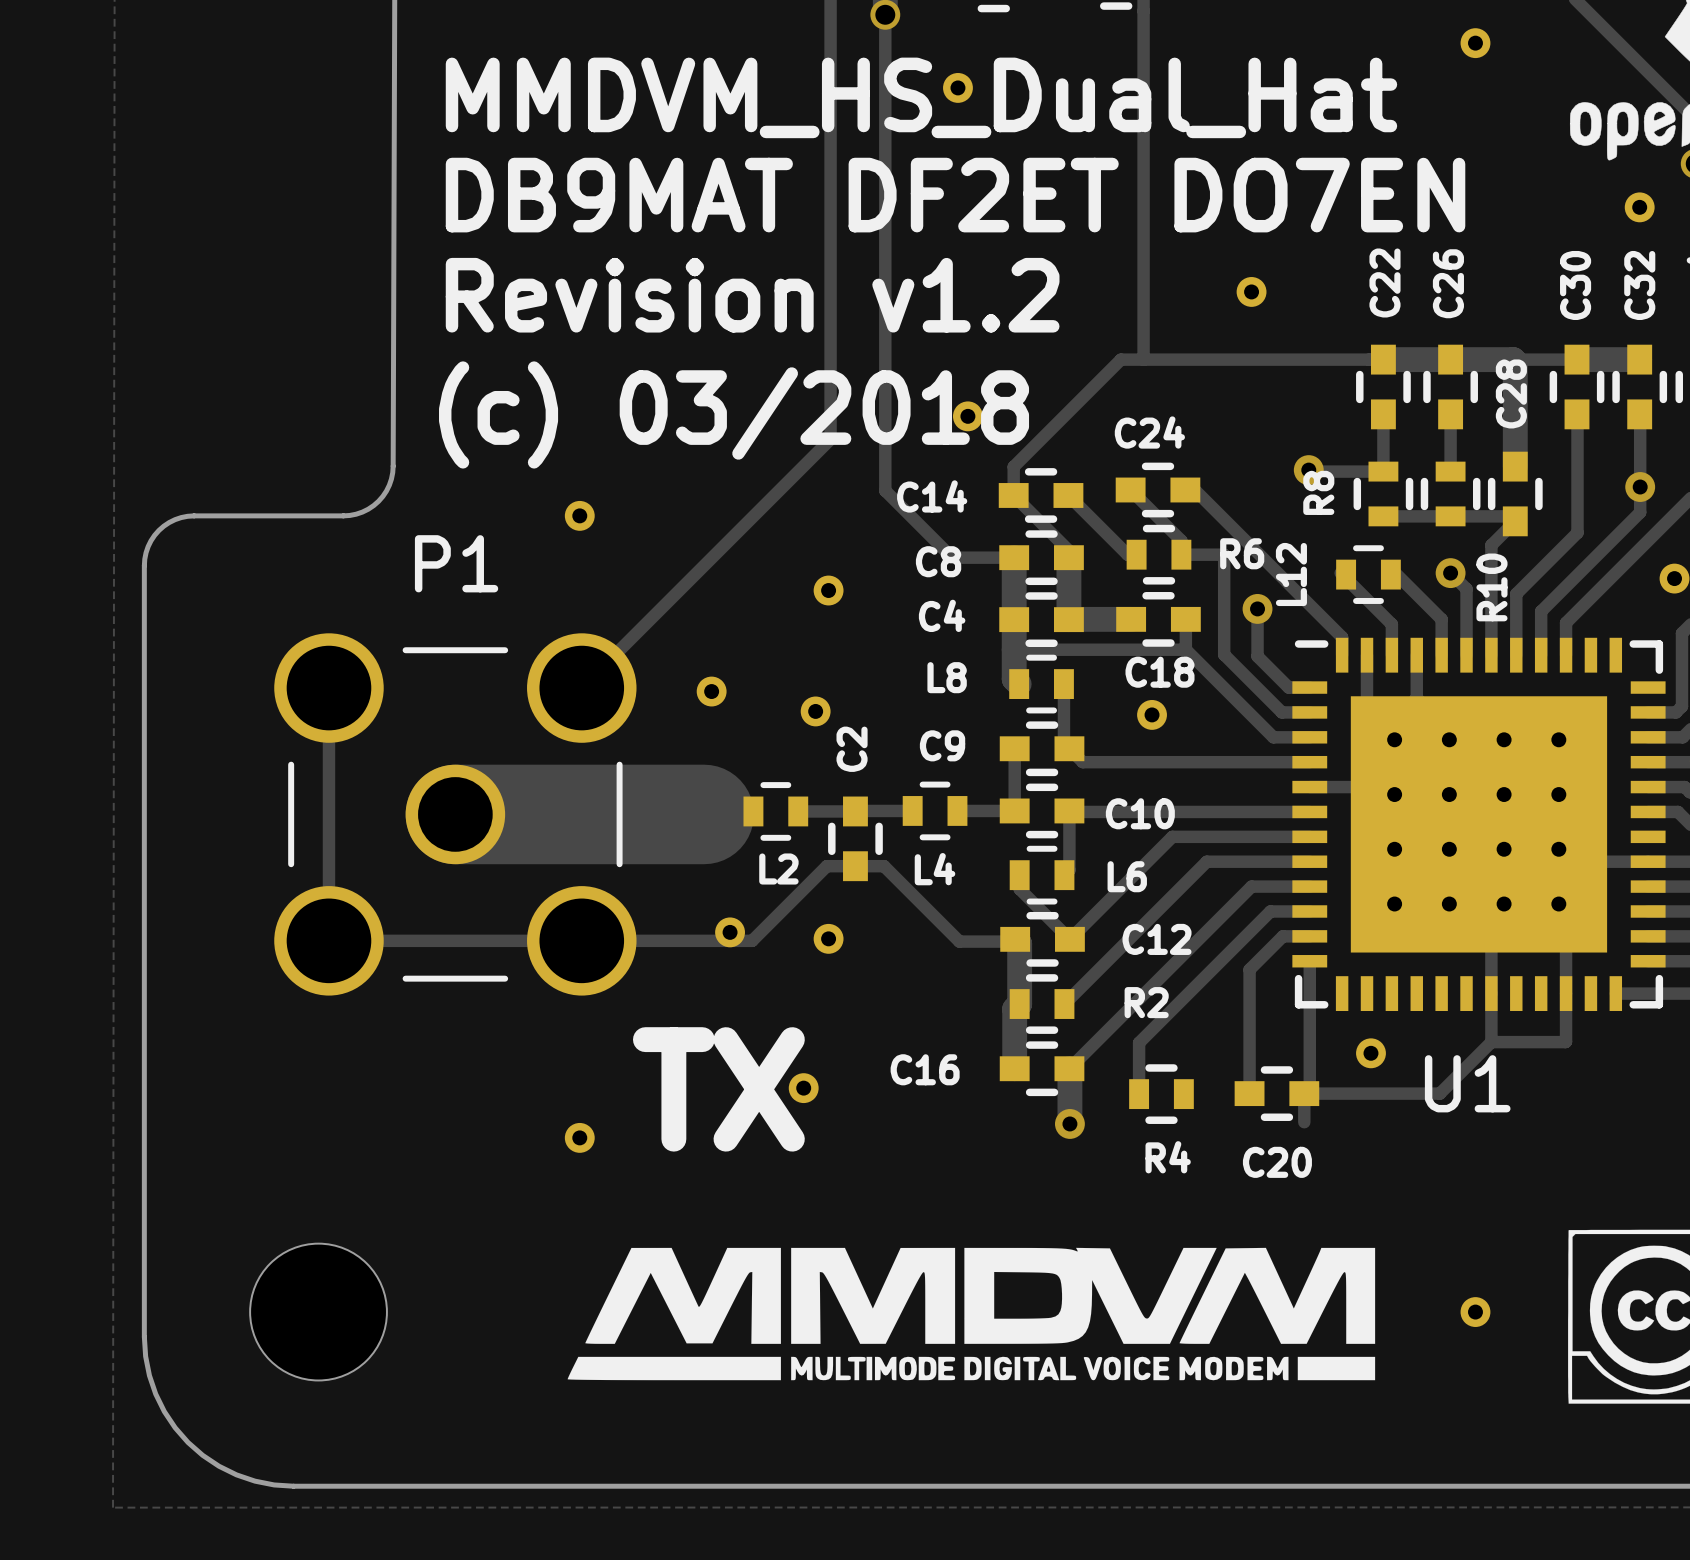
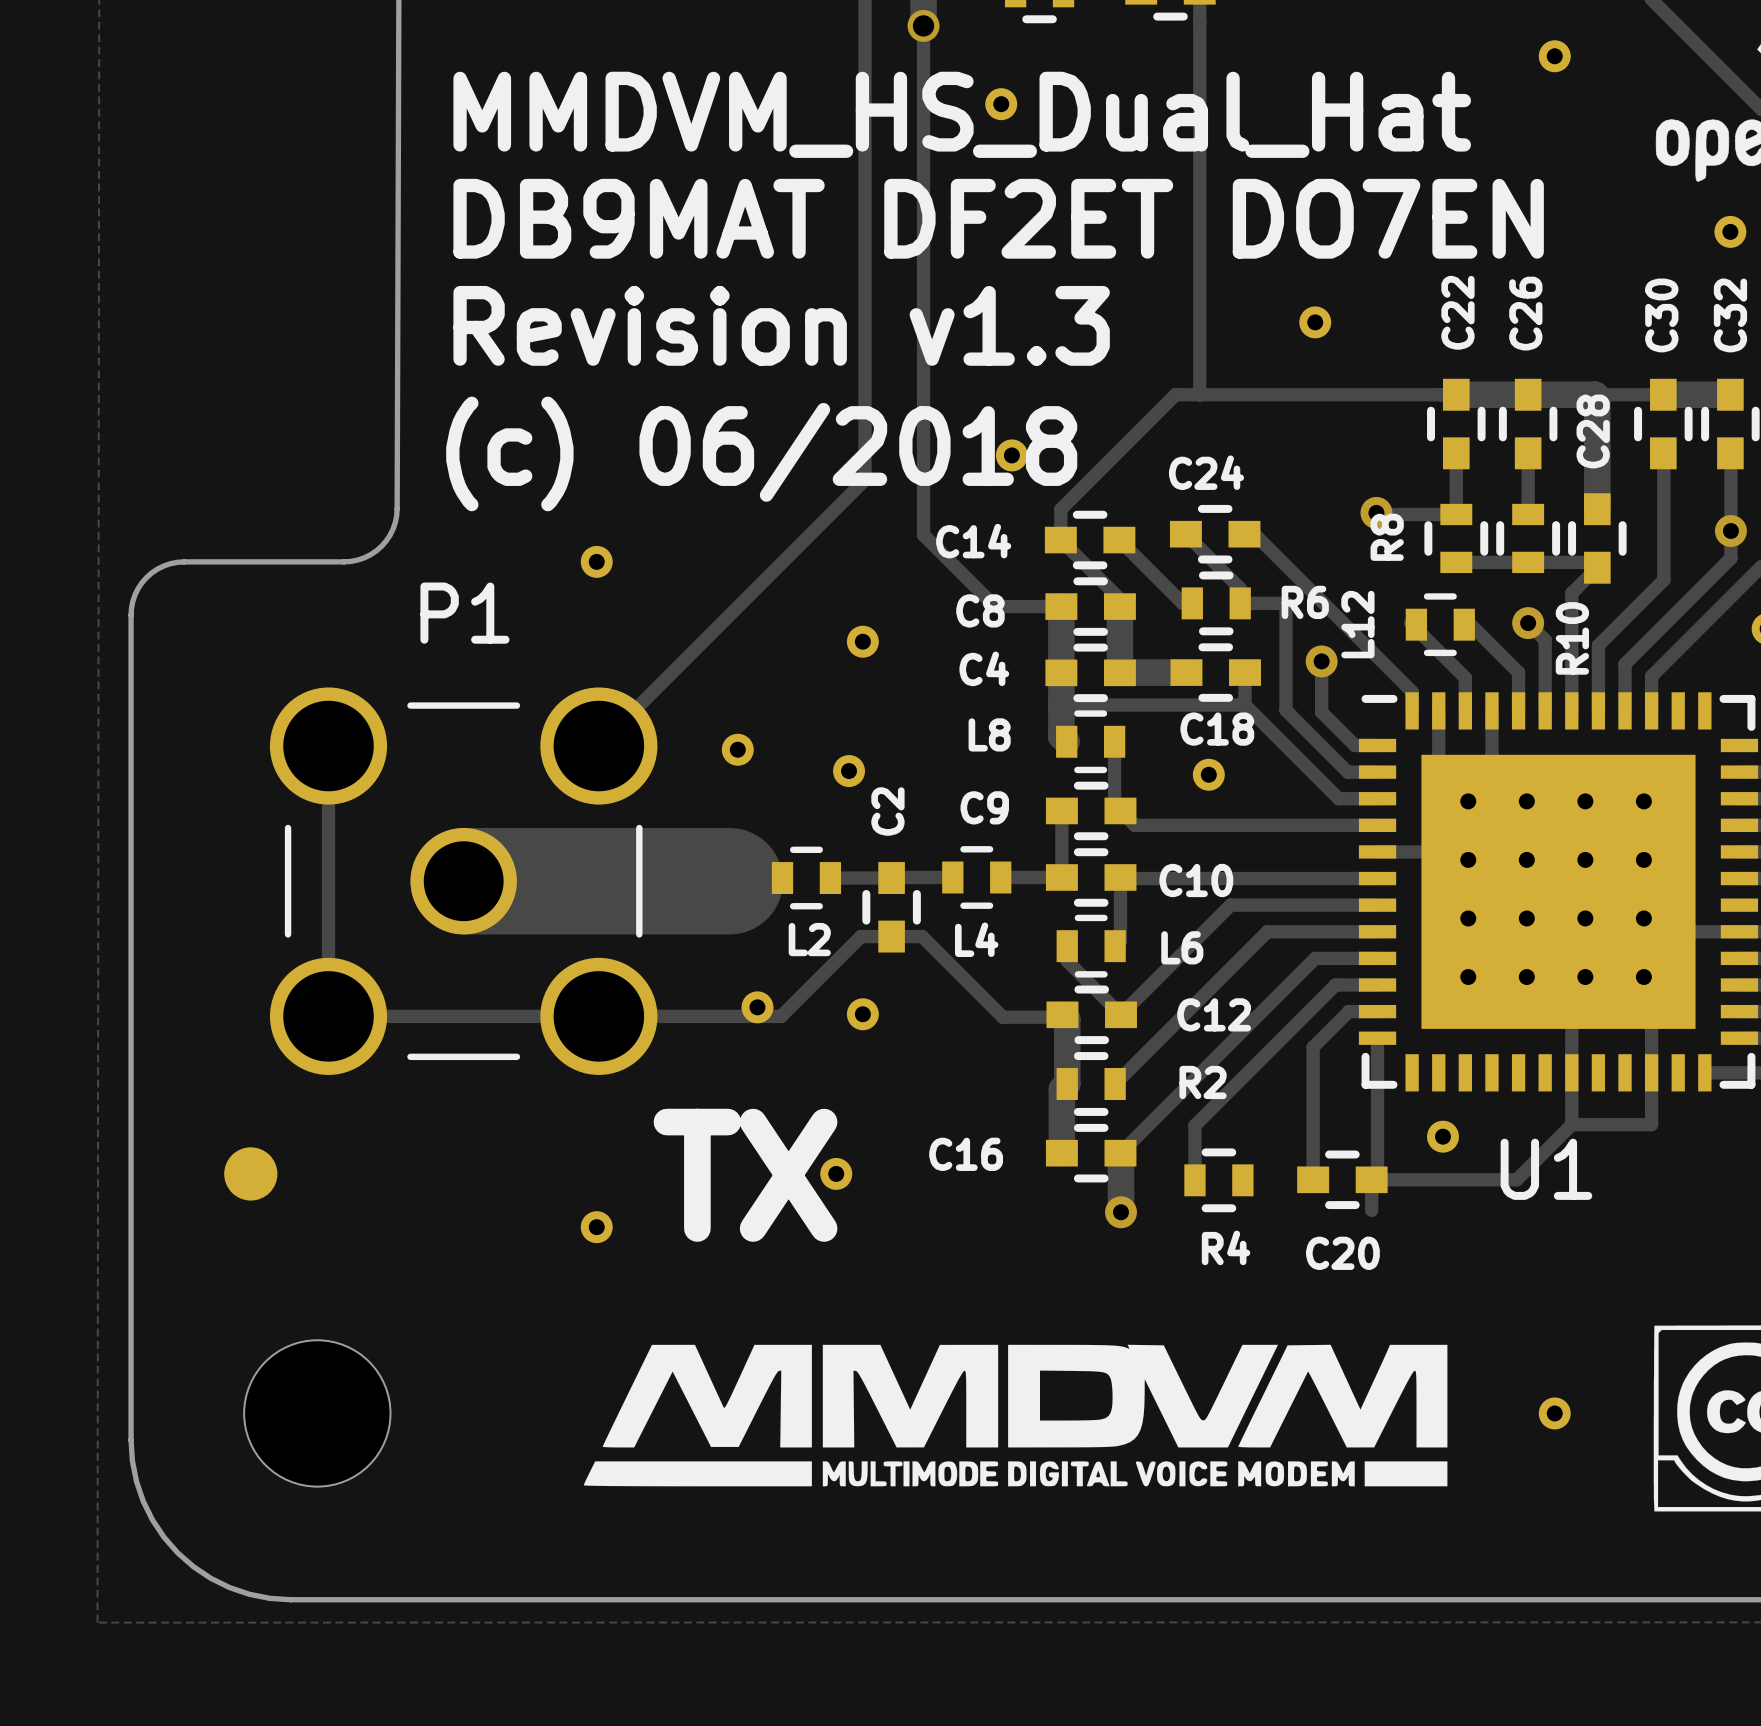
text: Revision v1.2 (752, 295) -> Revision v1.3 (781, 325)
text: (c) 03/2018 (734, 414) -> (c) 06/2018 (761, 453)
part: none -> (250, 1173)

